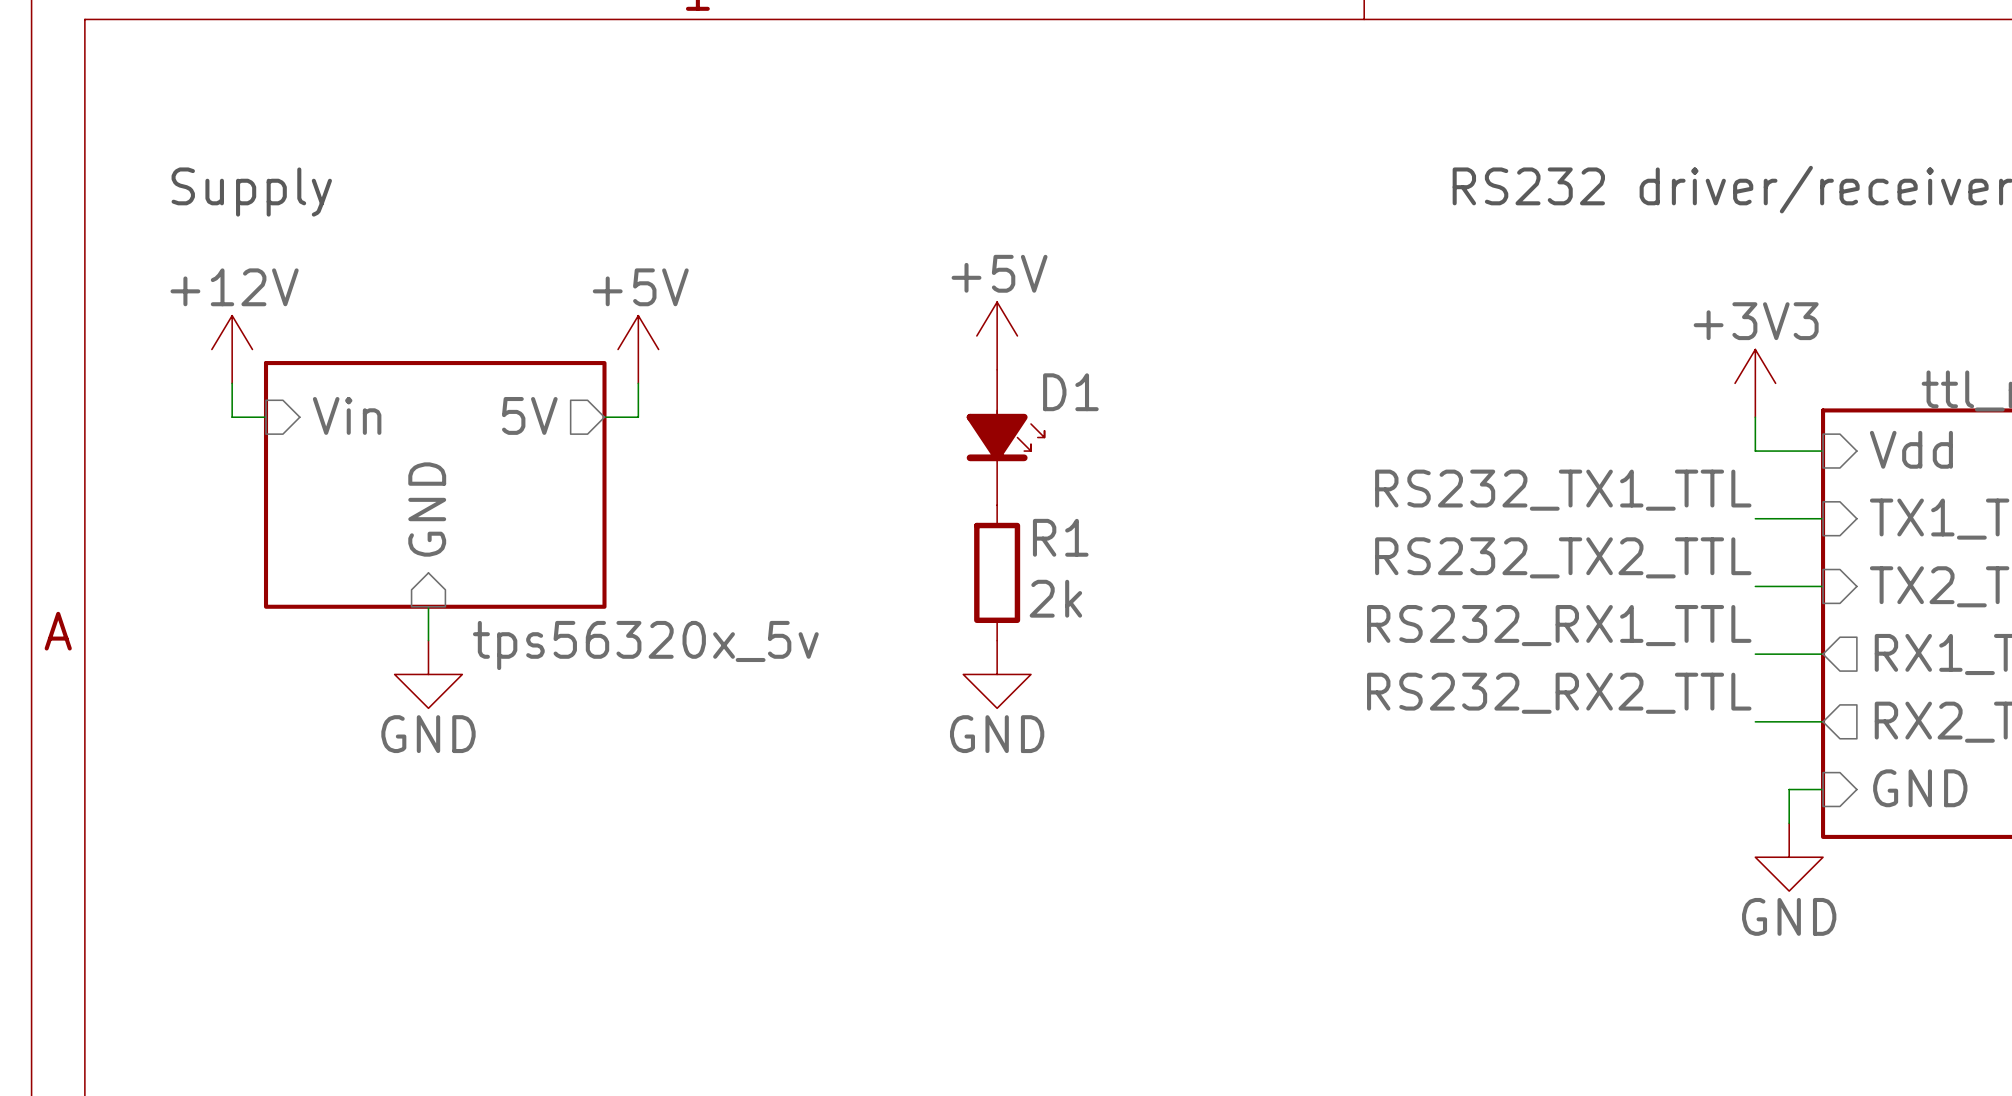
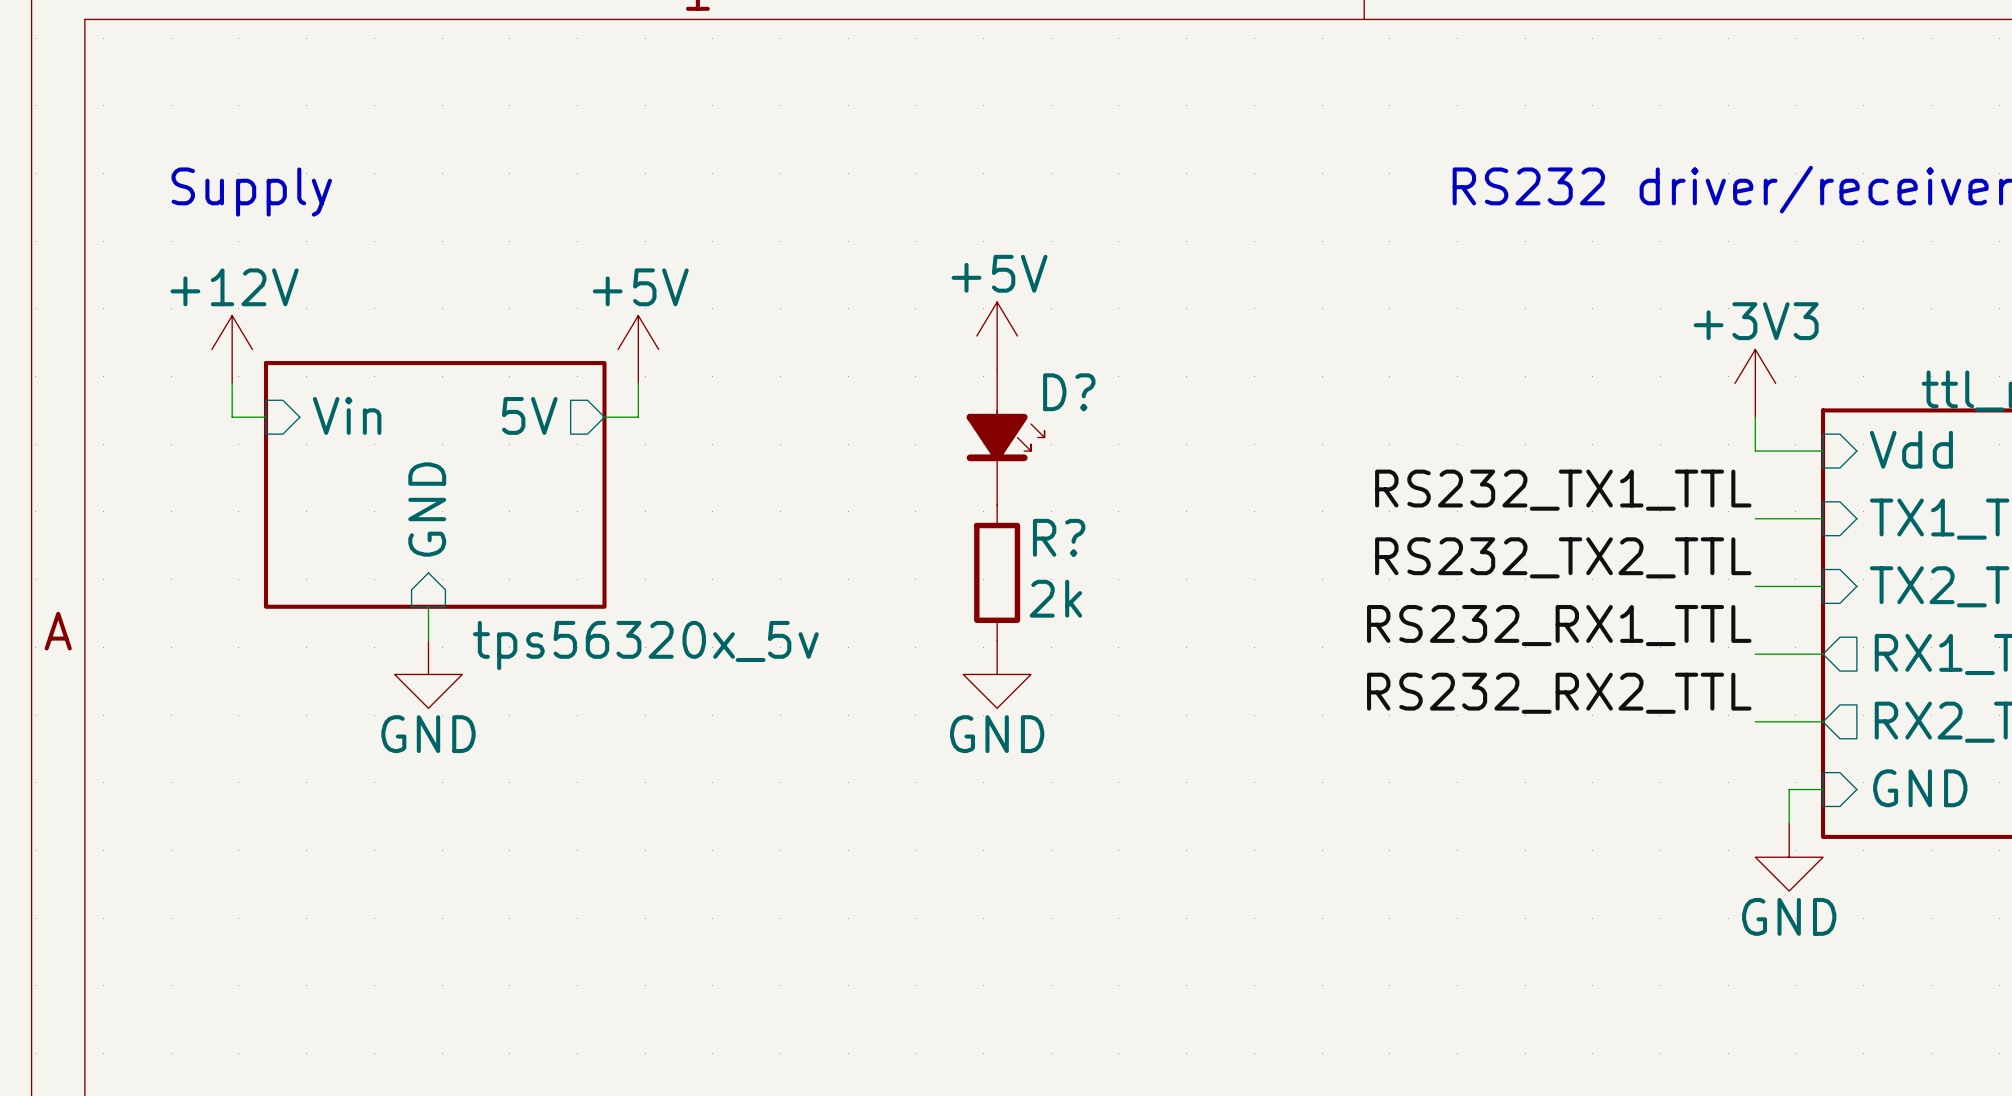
D1 name: D1 (1070, 392) -> D? (1069, 392)
R1 name: R1 (1060, 537) -> R? (1059, 537)

